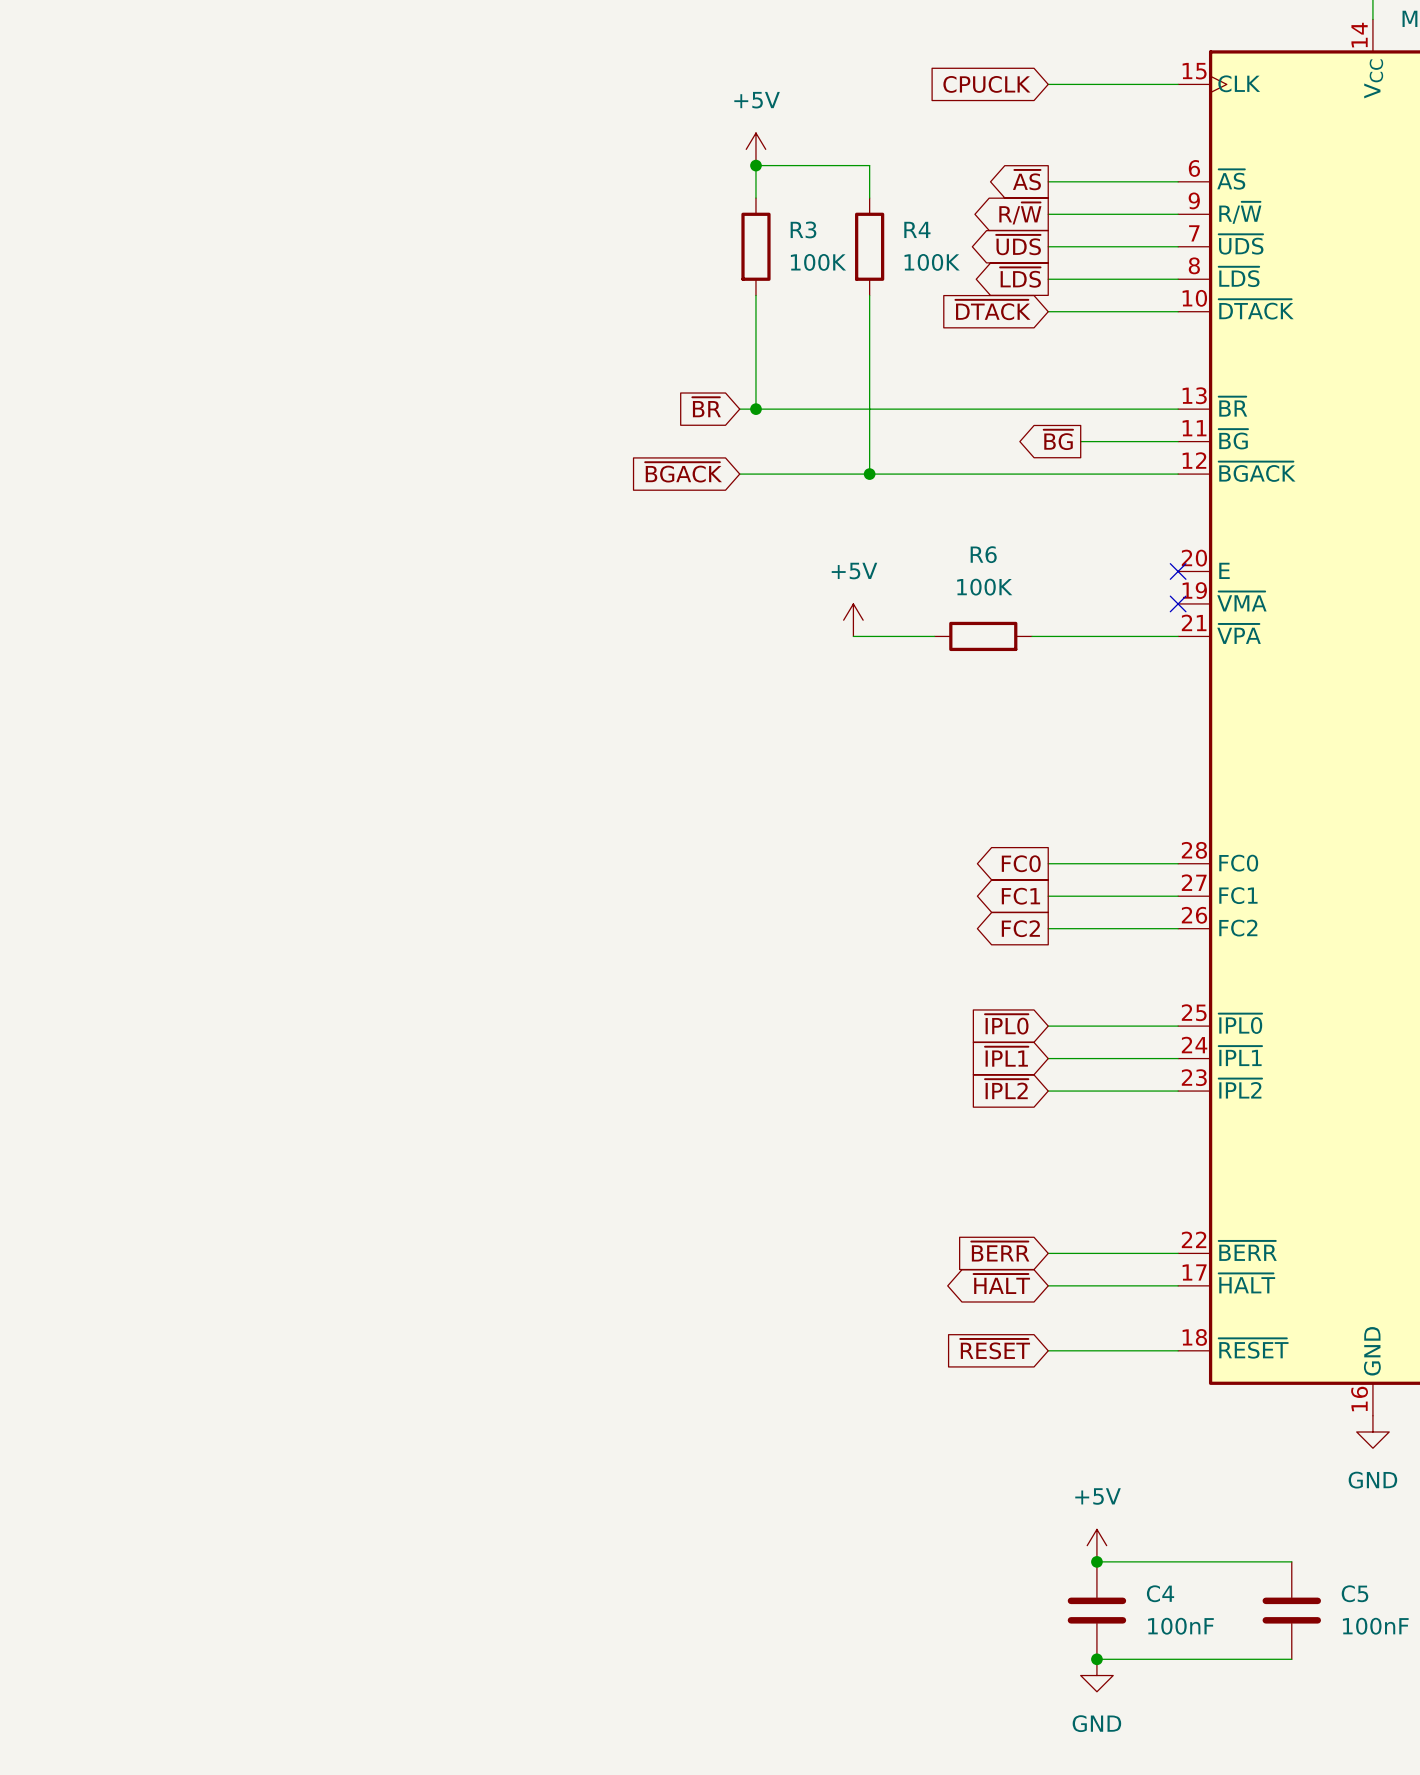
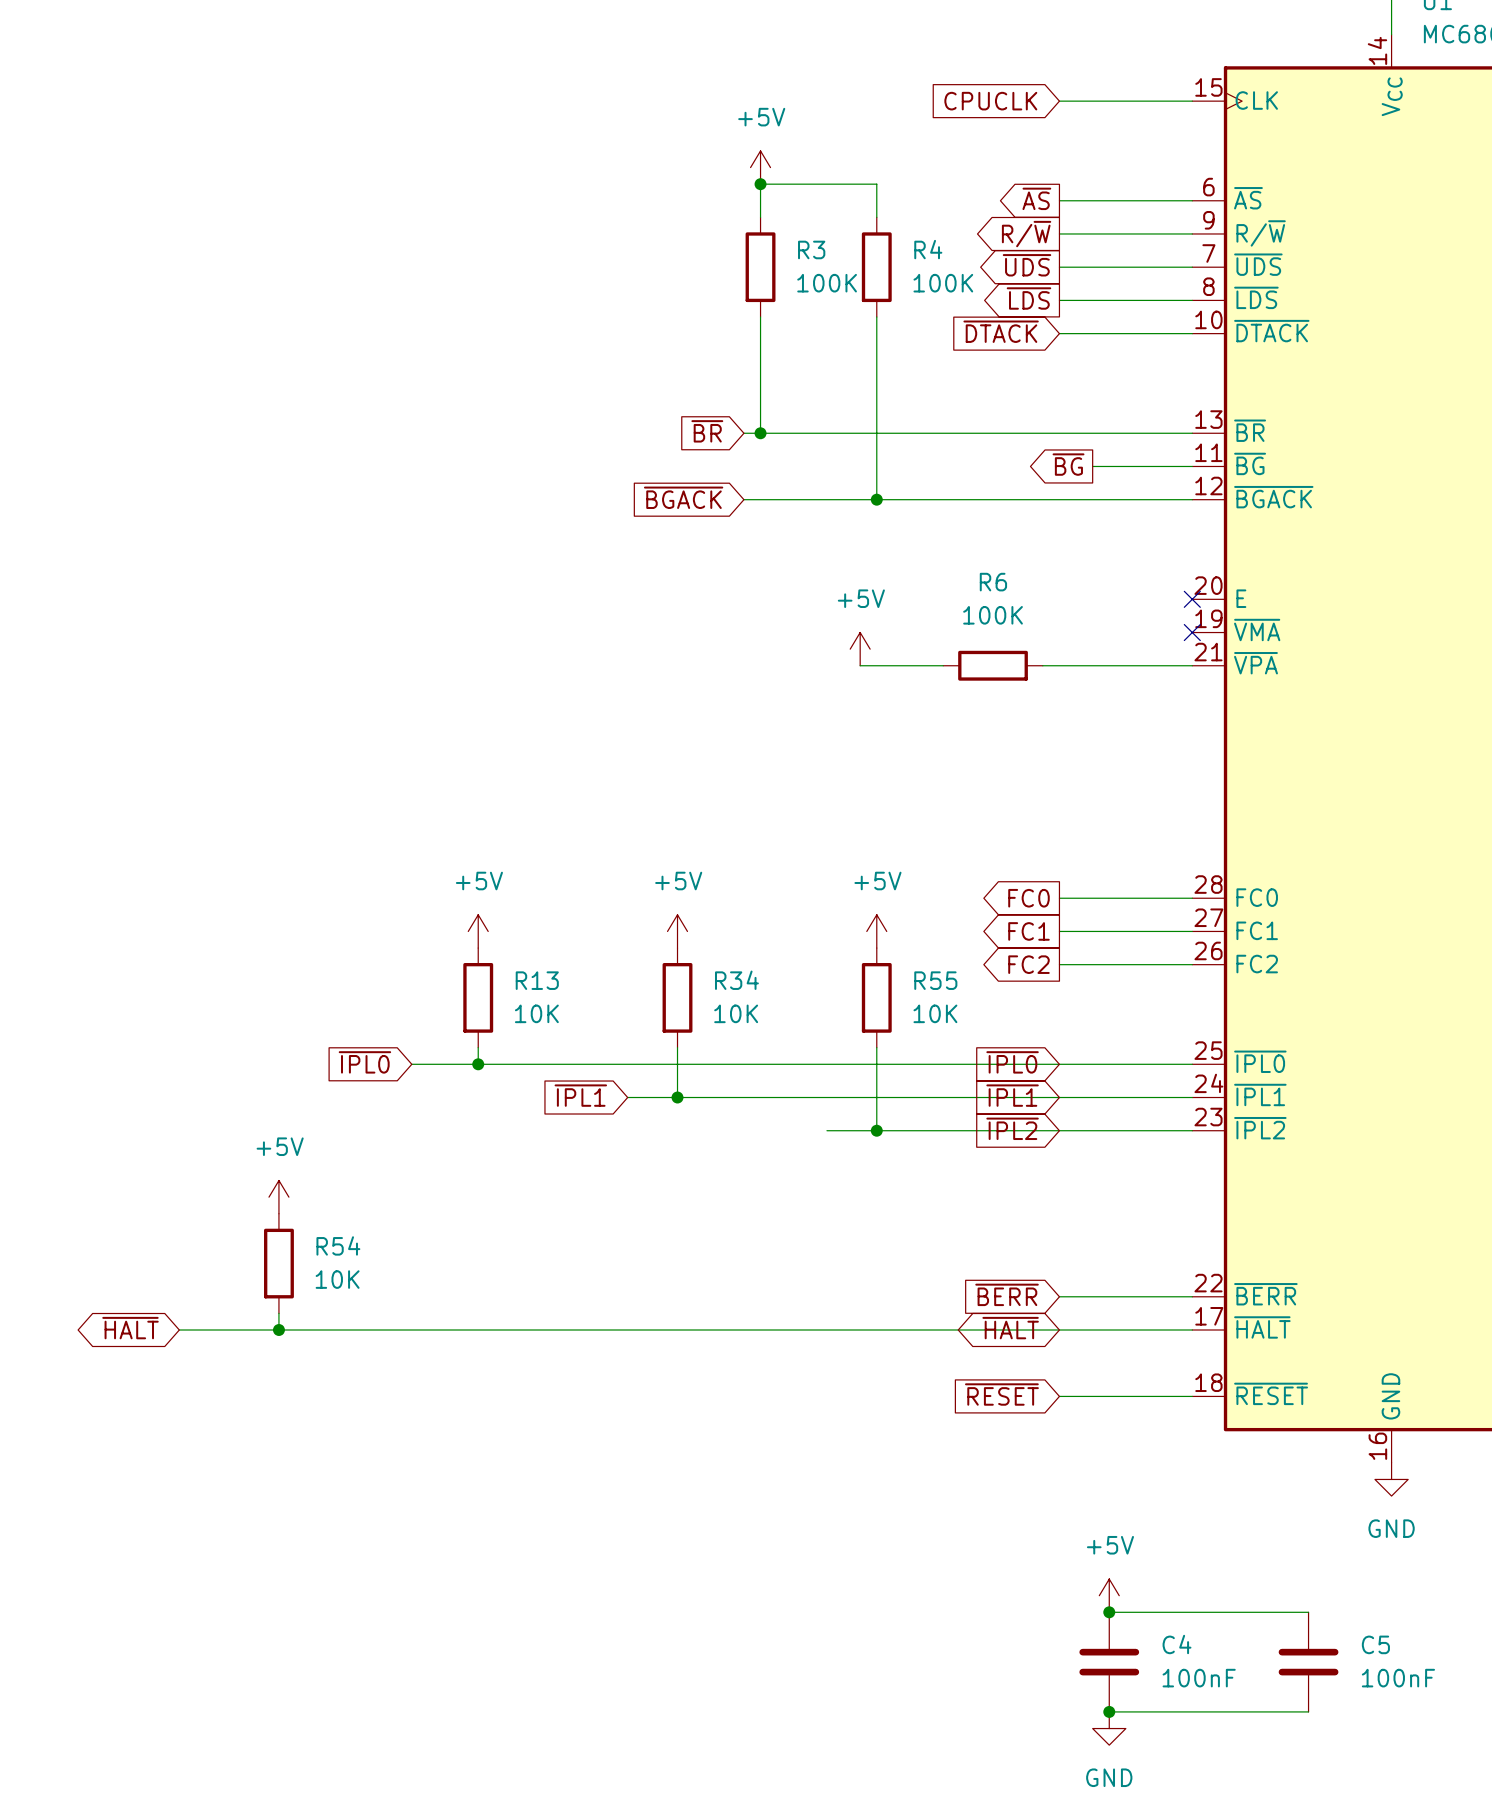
power symbol: none -> +5V (478, 931)
power symbol: none -> +5V (677, 931)
power symbol: none -> +5V (876, 931)
R13: none -> 10K (478, 997)
R34: none -> 10K (677, 997)
R55: none -> 10K (876, 997)
wire: none -> (478, 1047) (478, 1064)
wire: none -> (677, 1047) (677, 1097)
wire: none -> (876, 1047) (876, 1130)
global label: none -> ~{IPL0} (364, 1062)
wire: none -> (411, 1064) (1059, 1064)
junction: none -> (478, 1064)
global label: none -> ~{IPL1} (580, 1095)
wire: none -> (627, 1097) (1059, 1097)
junction: none -> (677, 1097)
wire: none -> (826, 1130) (1059, 1130)
junction: none -> (876, 1130)
power symbol: none -> +5V (278, 1197)
R54: none -> 10K (278, 1263)
wire: none -> (278, 1313) (278, 1330)
global label: none -> ~{HALT} (130, 1328)
wire: none -> (179, 1330) (1059, 1330)
junction: none -> (278, 1330)

